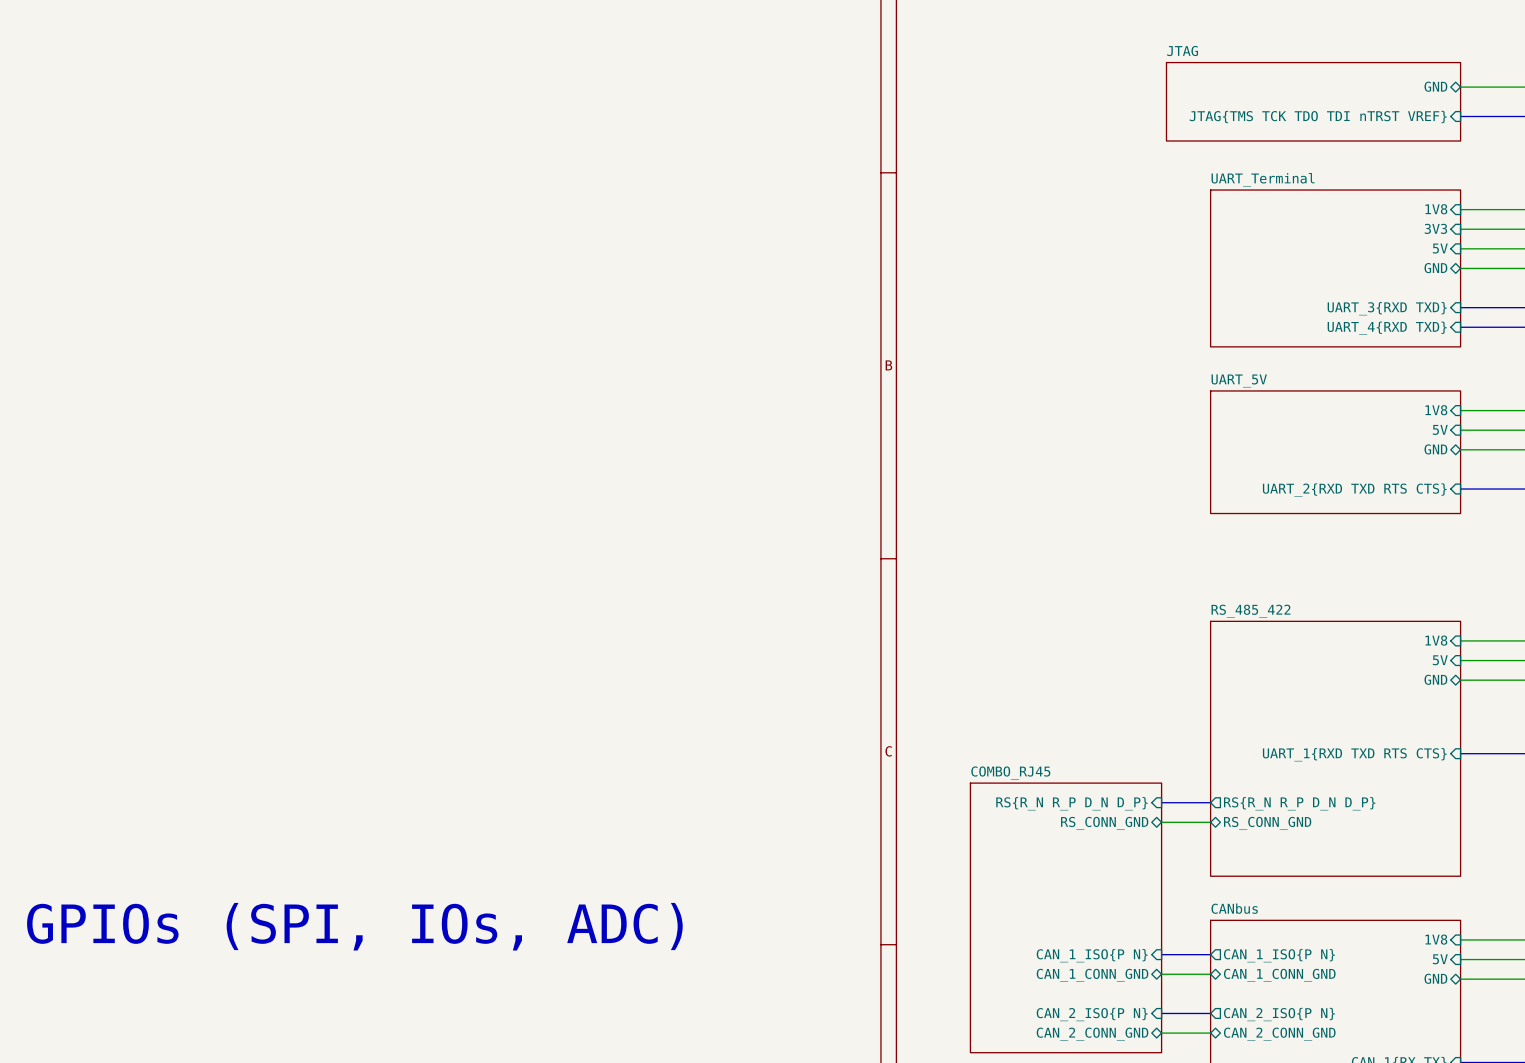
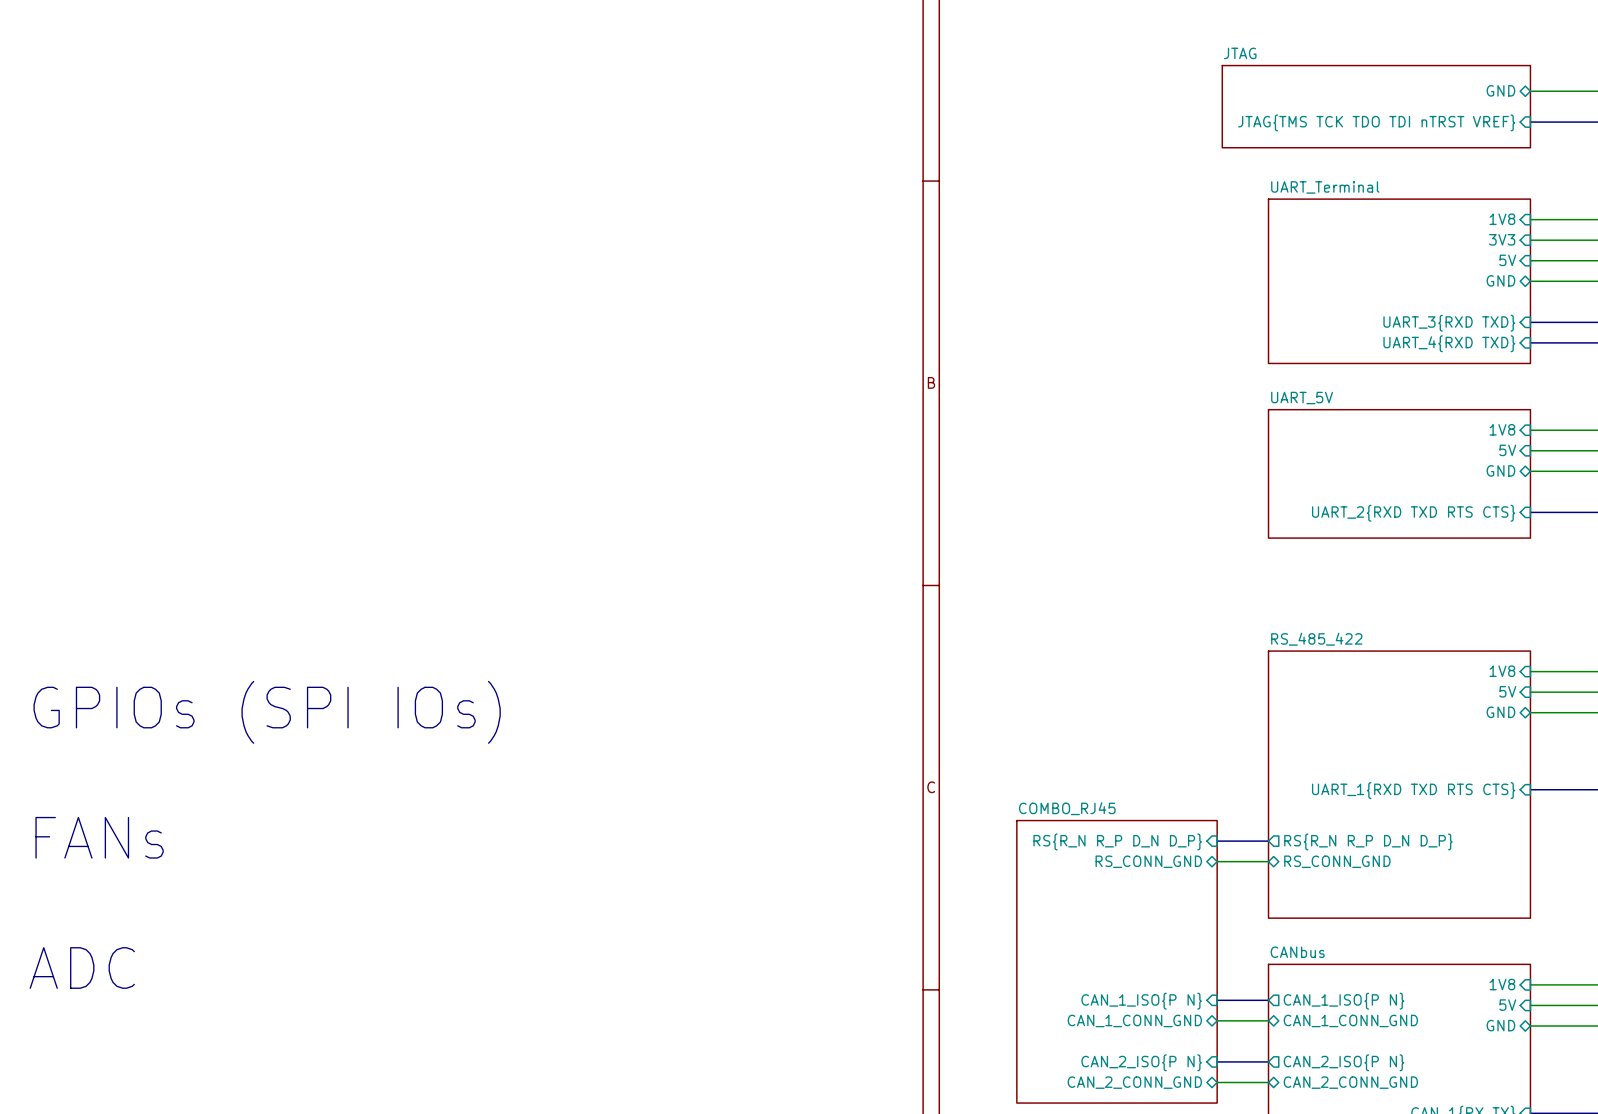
text: none -> GPIOs (SPI IOs) (267, 712)
text: none -> FANs (99, 837)
text: GPIOs (SPI, IOs, ADC) (354, 926) -> ADC (82, 967)

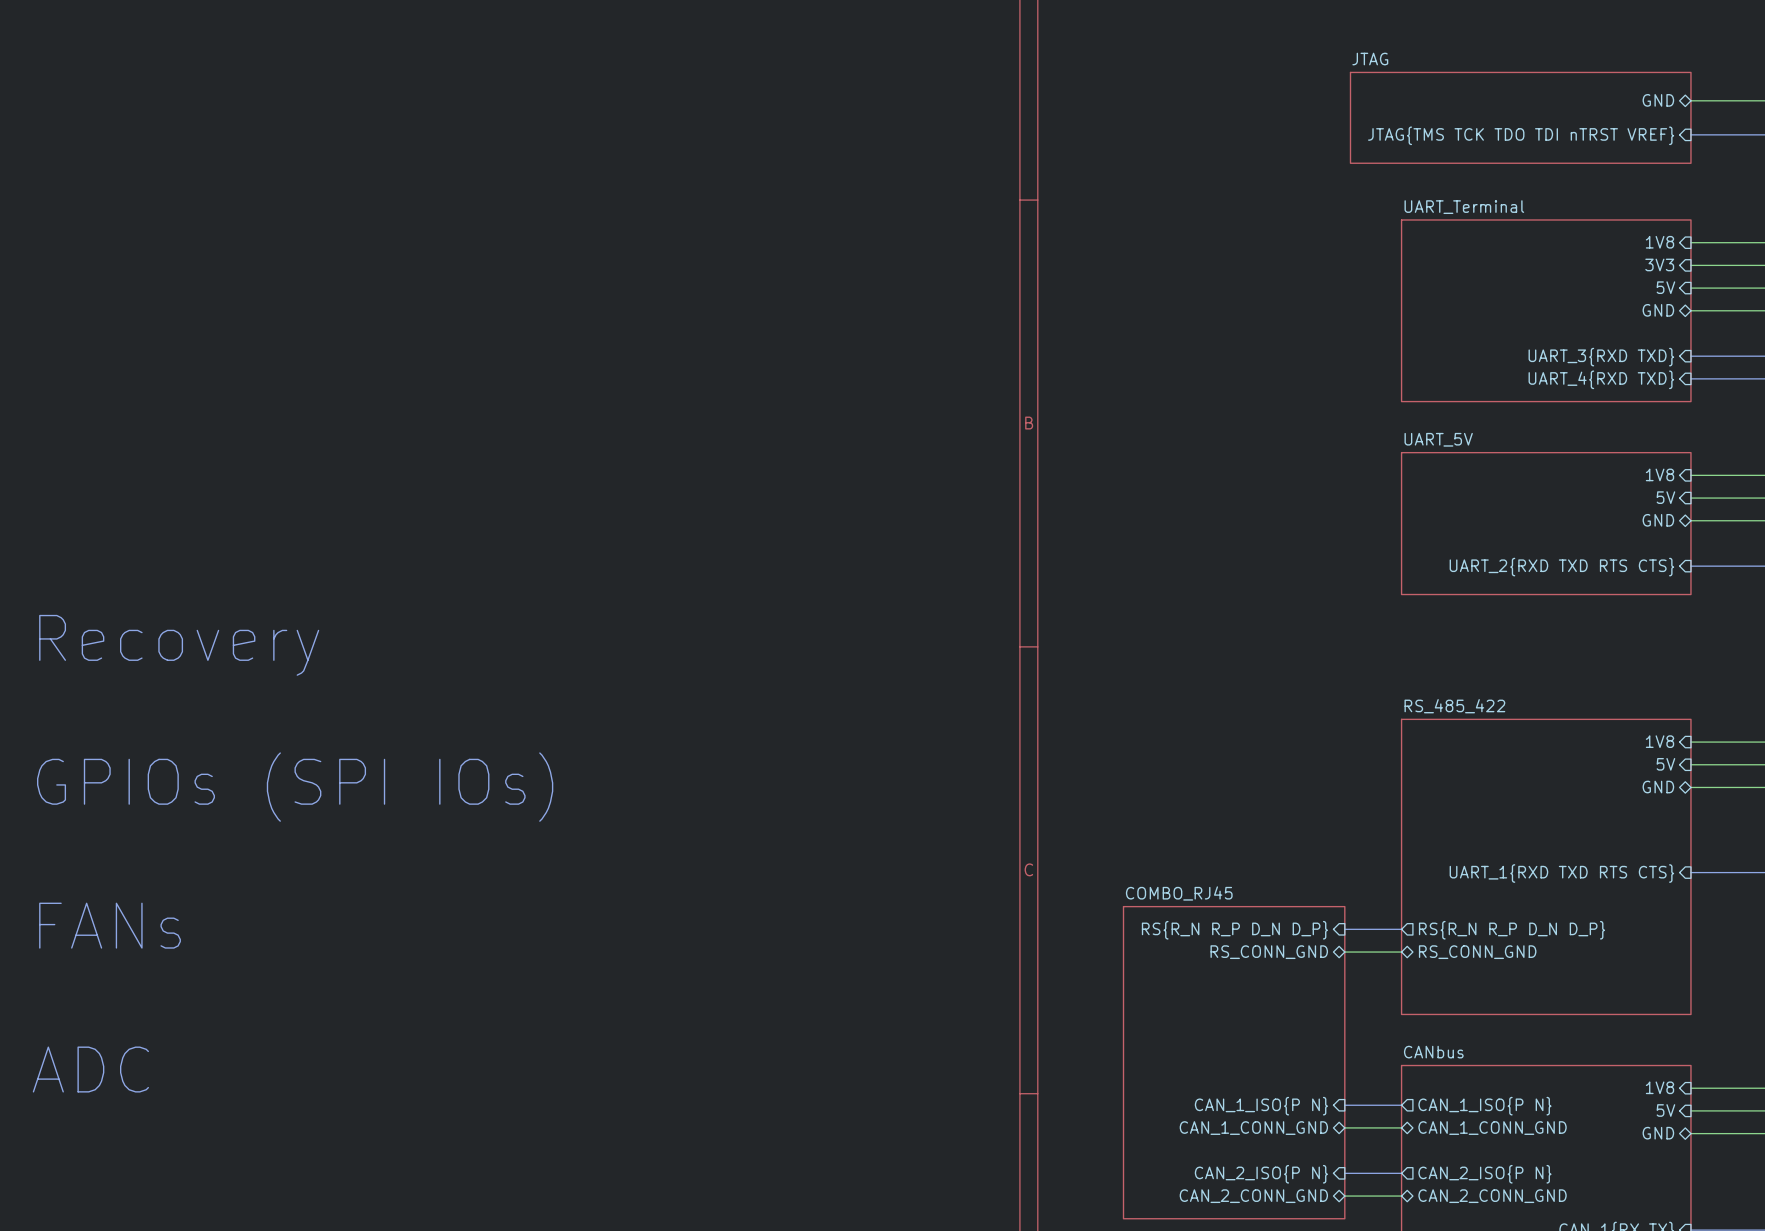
text: none -> Recovery (179, 645)

